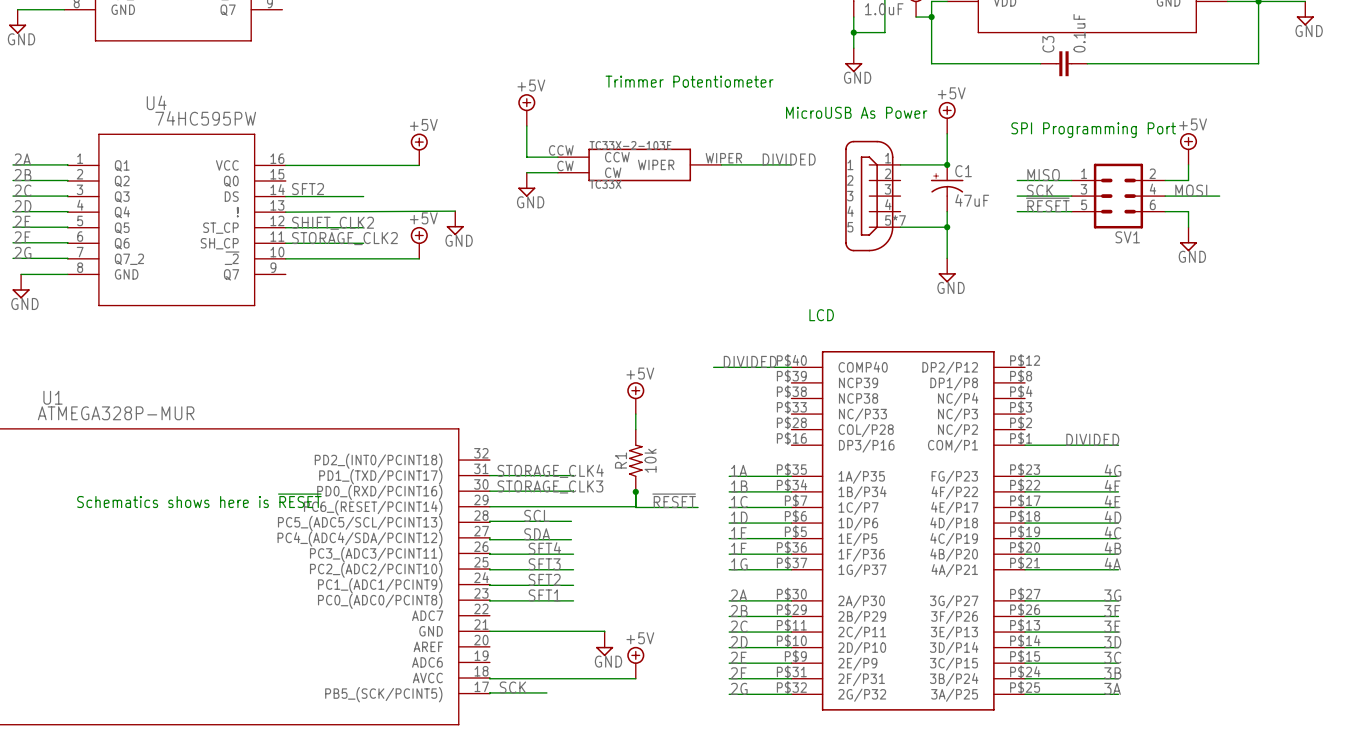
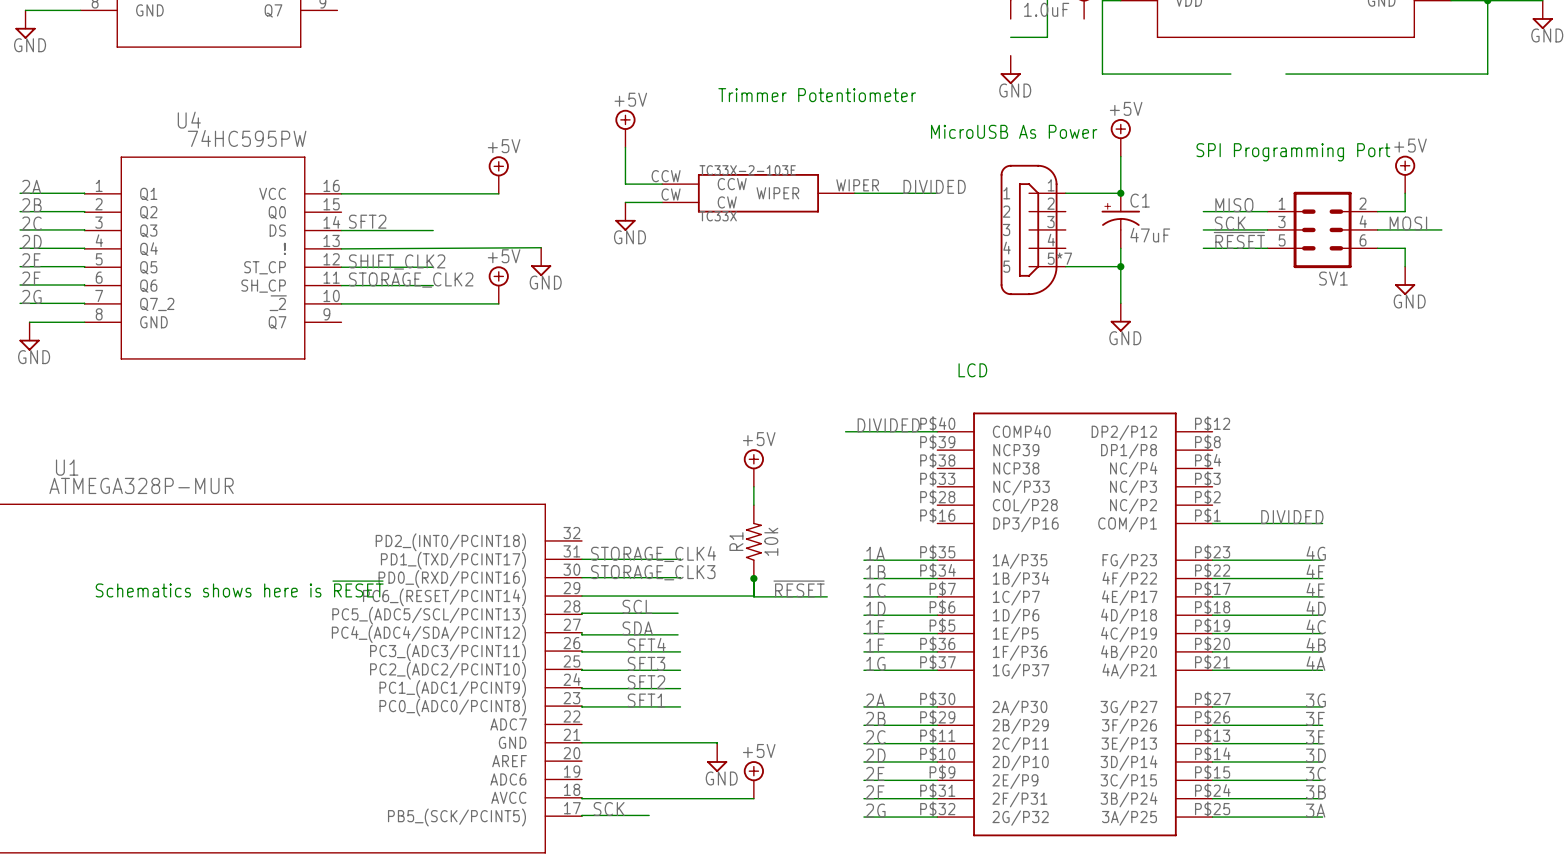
wire: (853, 17) (853, 48) -> none
wire: (916, 17) (931, 17) -> none
junction: (931, 17) -> none
junction: (853, 32) -> none
C3: 0.1uF (1063, 63) -> none

